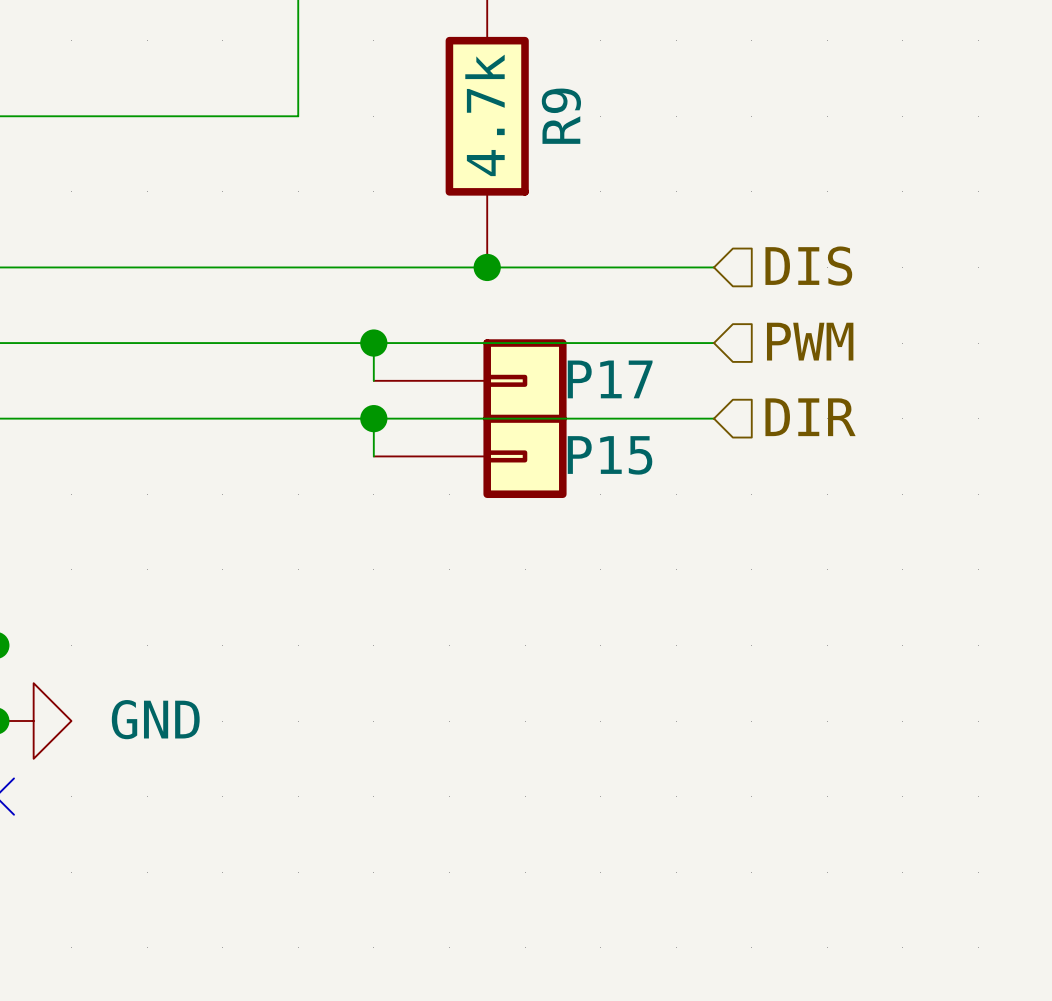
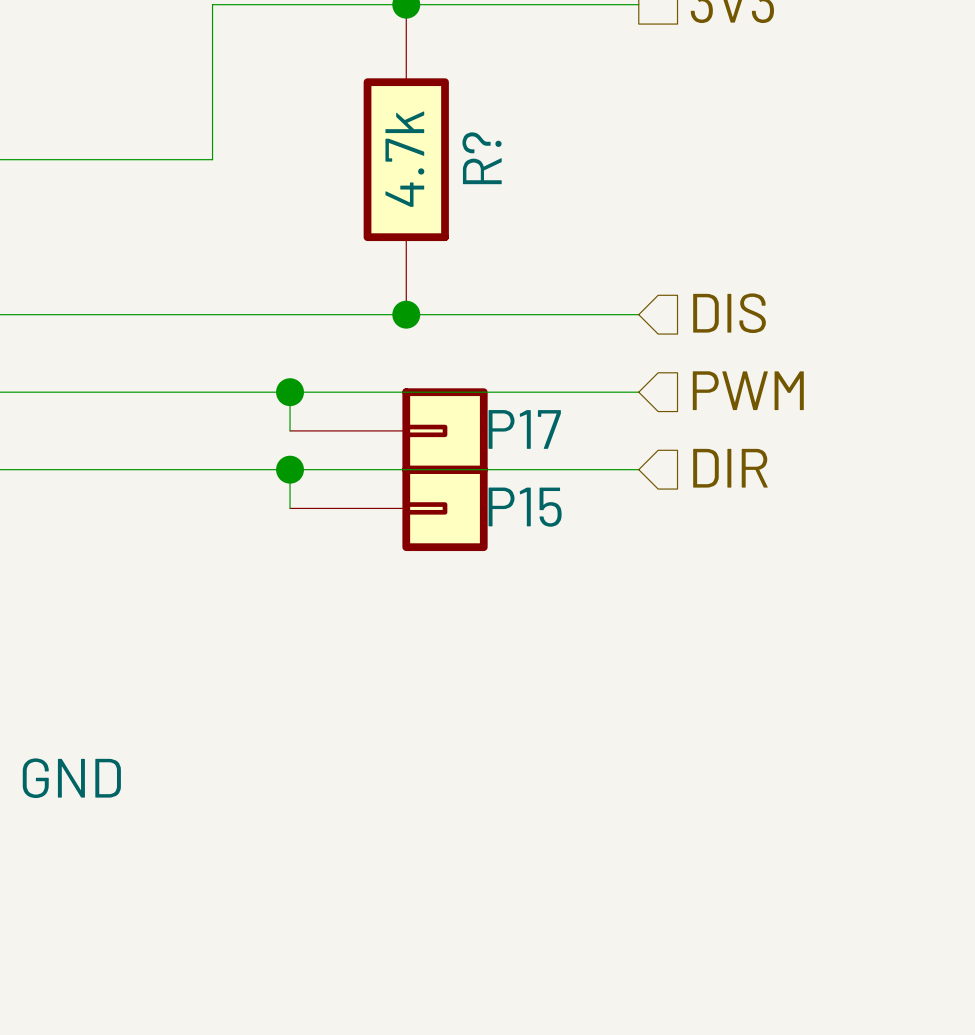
R9 name: R9 (561, 116) -> R? (482, 158)

